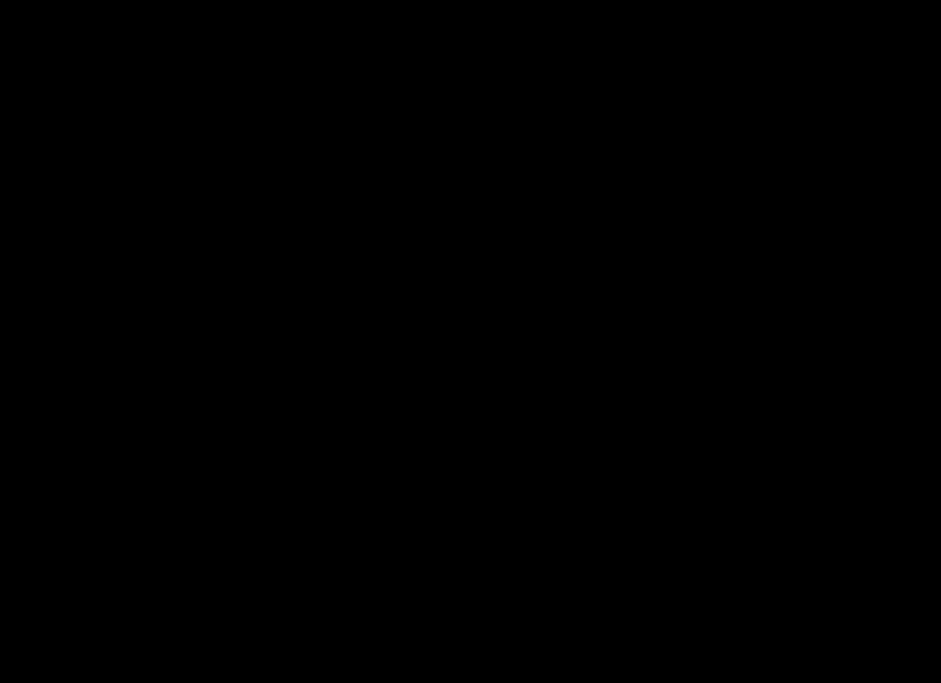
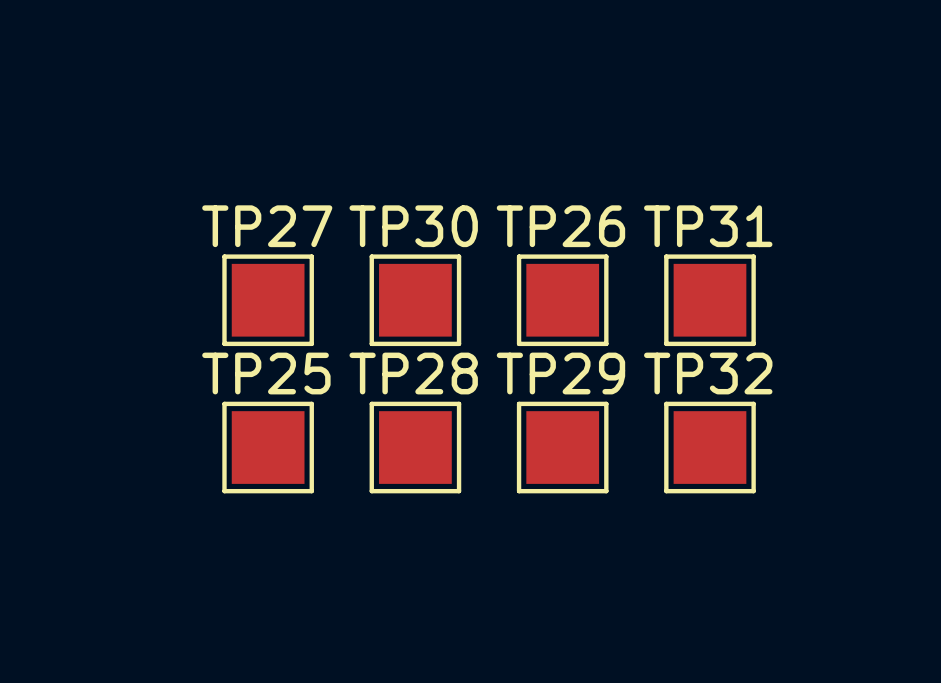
TP27: none -> (268, 300)
TP30: none -> (415, 300)
TP26: none -> (562, 300)
TP31: none -> (709, 300)
TP25: none -> (268, 447)
TP28: none -> (415, 447)
TP29: none -> (562, 447)
TP32: none -> (709, 447)

